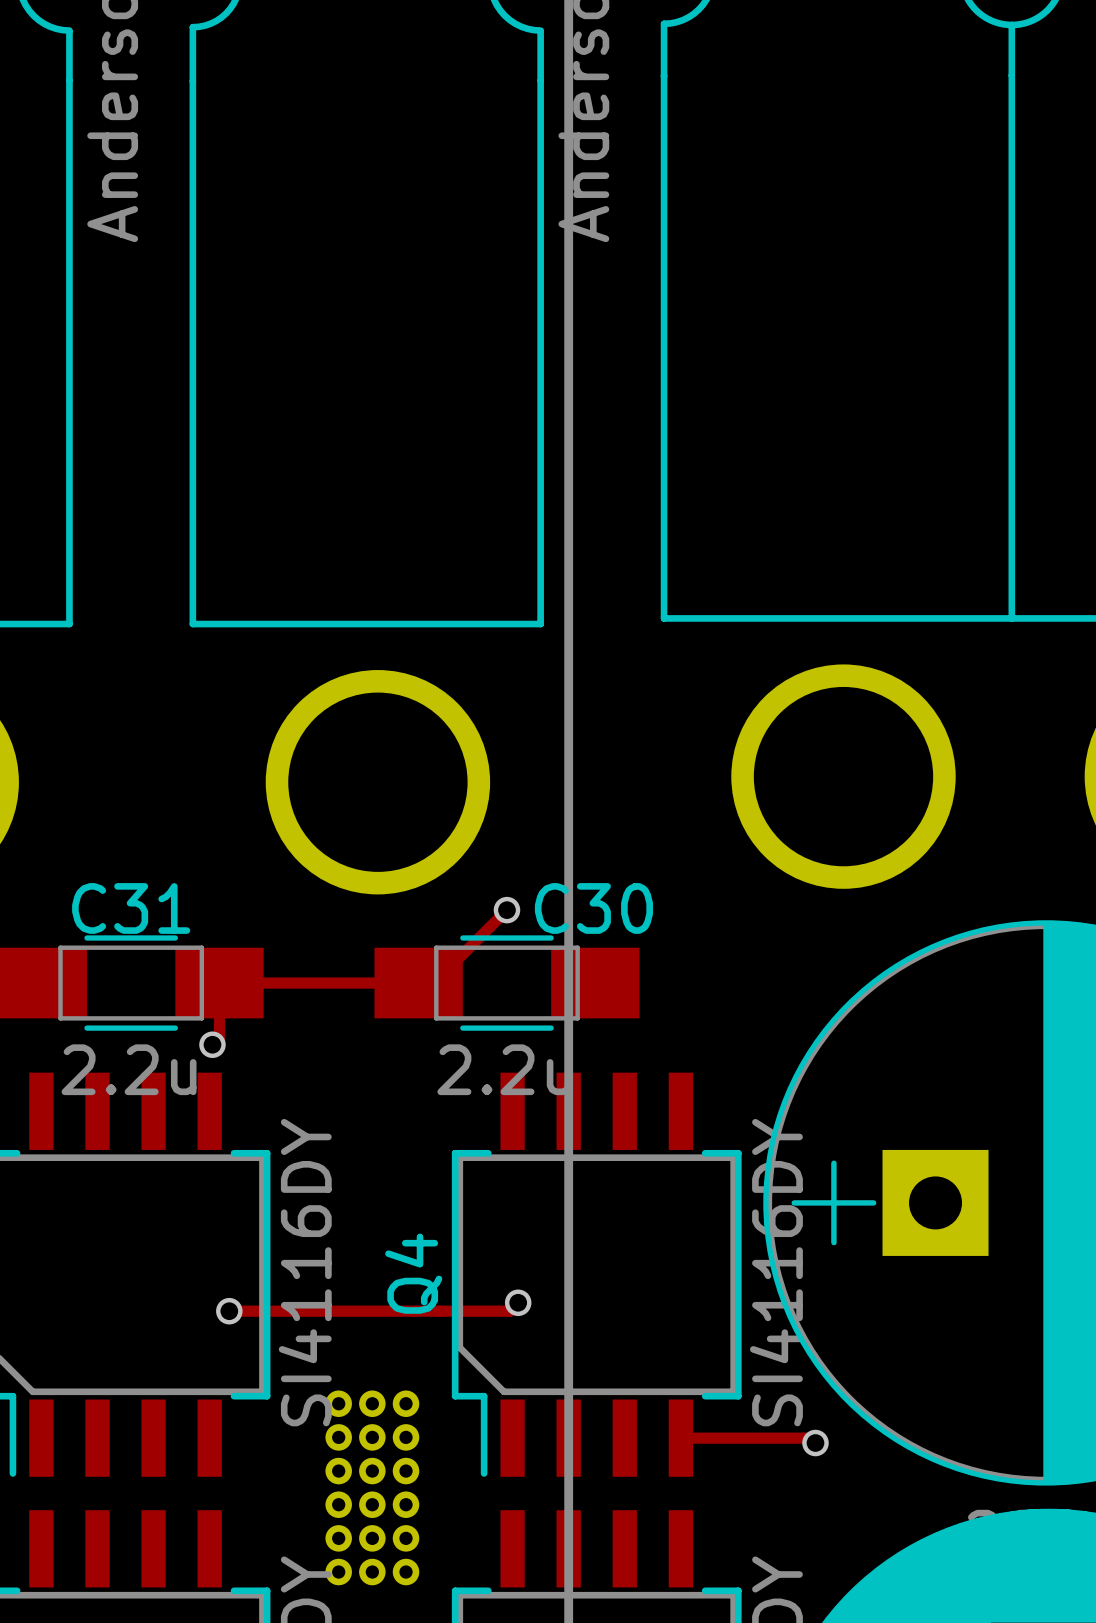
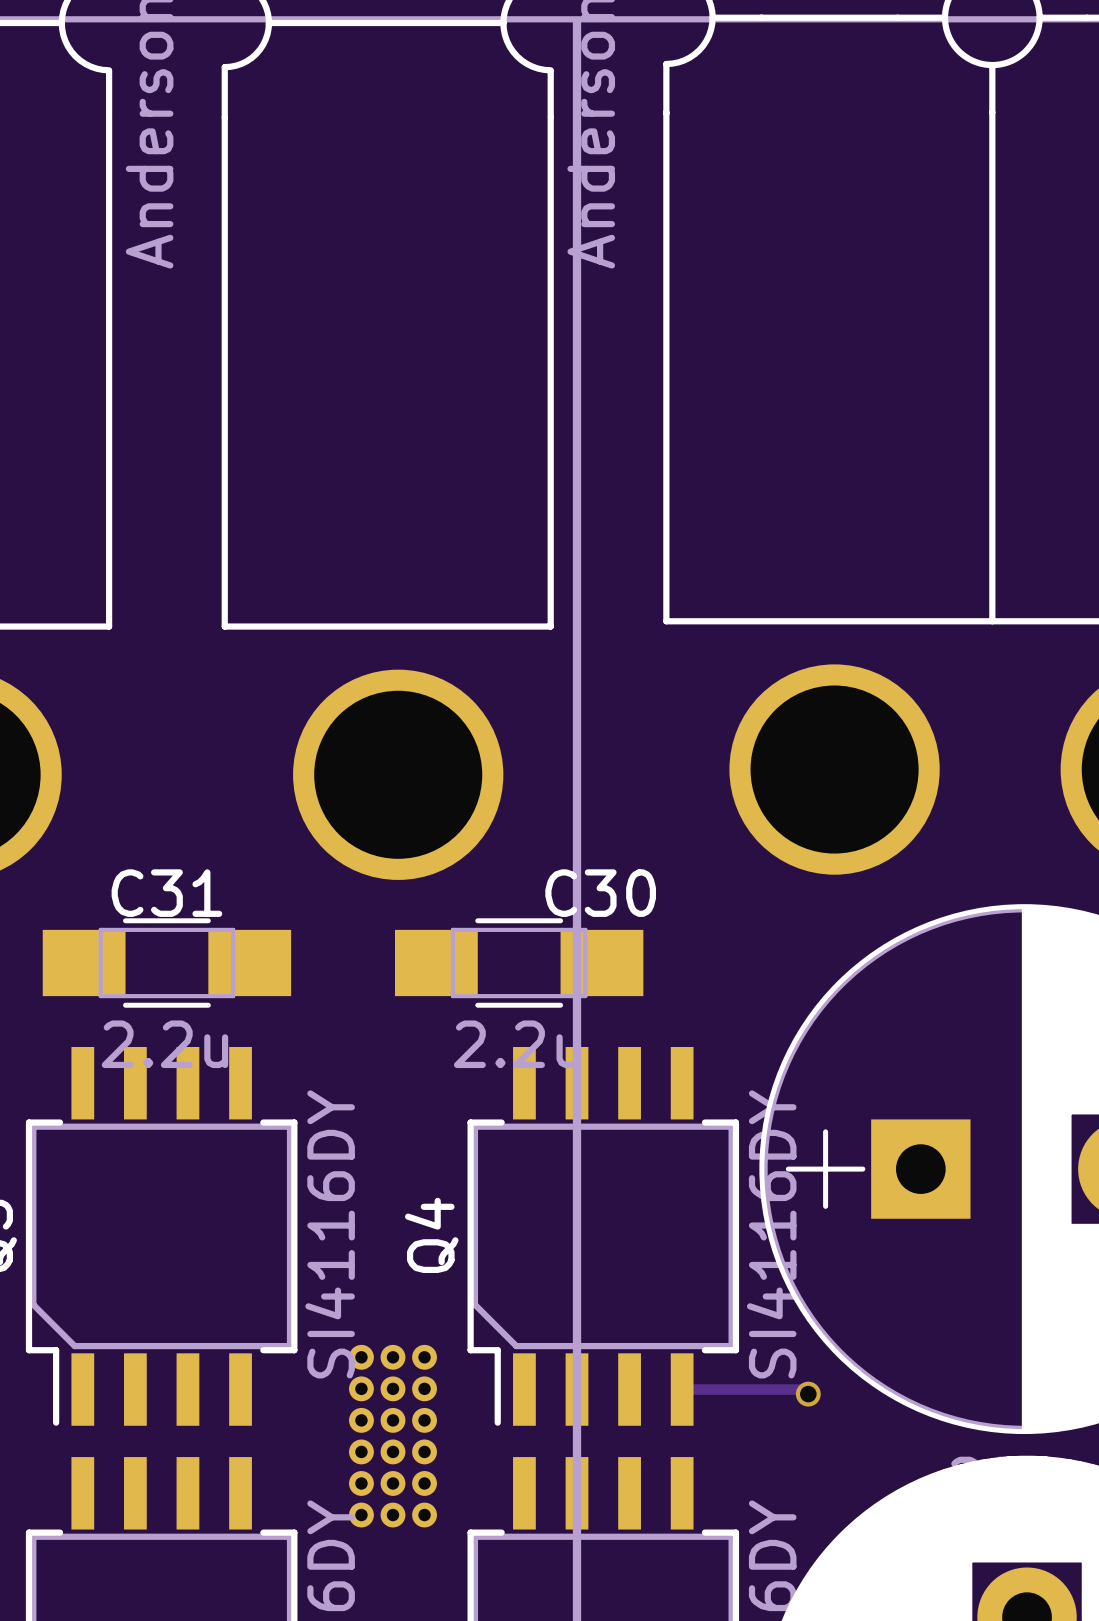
track: (506, 910) (434, 983) (219, 983) (219, 1037) (212, 1044) -> none
via: (506, 910) -> none
via: (212, 1044) -> none
track: (518, 1302) (509, 1311) (229, 1311) -> none
via: (518, 1302) -> none
via: (229, 1311) -> none

